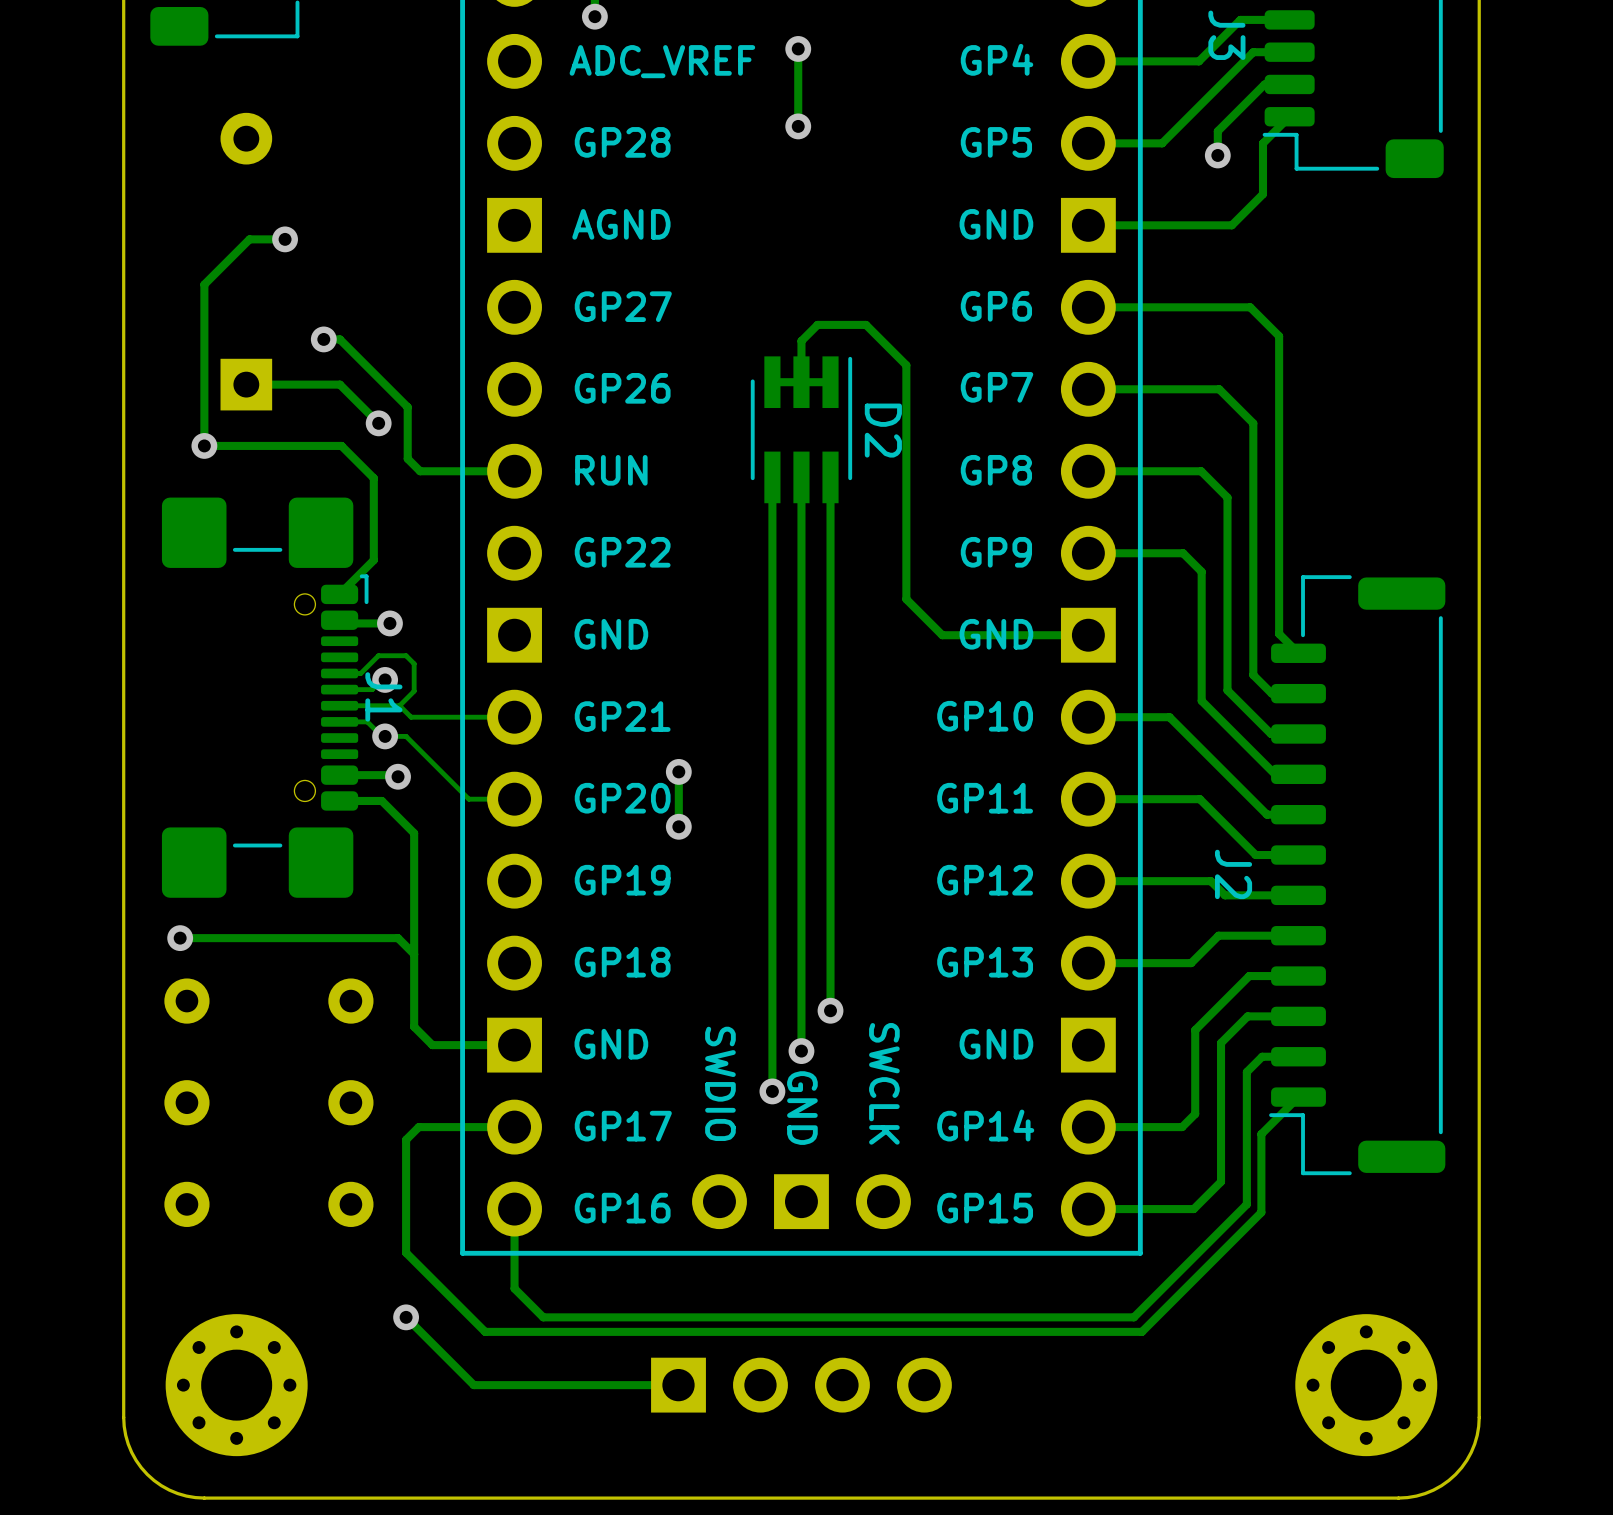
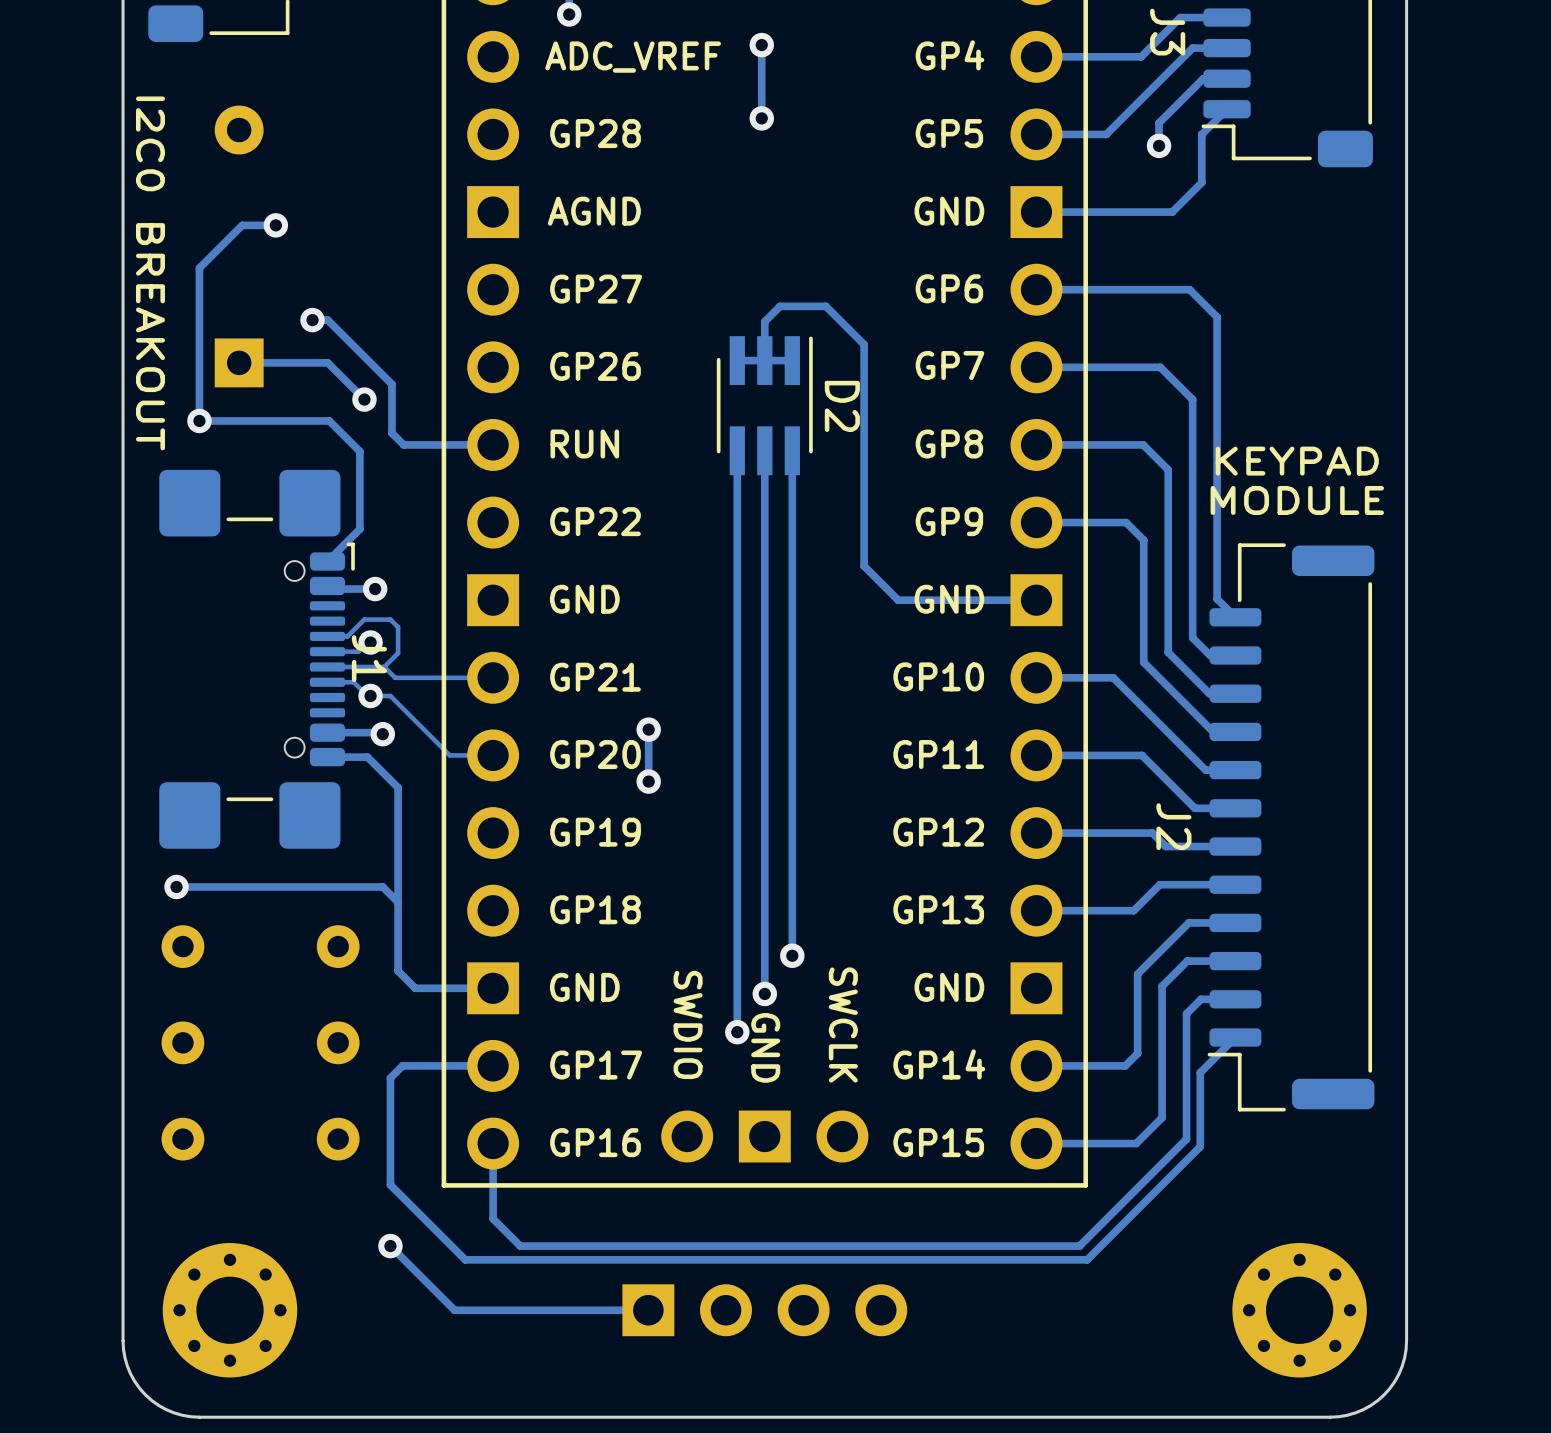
text: none -> I2C0 BREAKOUT (150, 273)
text: none -> KEYPAD (1297, 461)
text: none -> MODULE (1297, 500)

